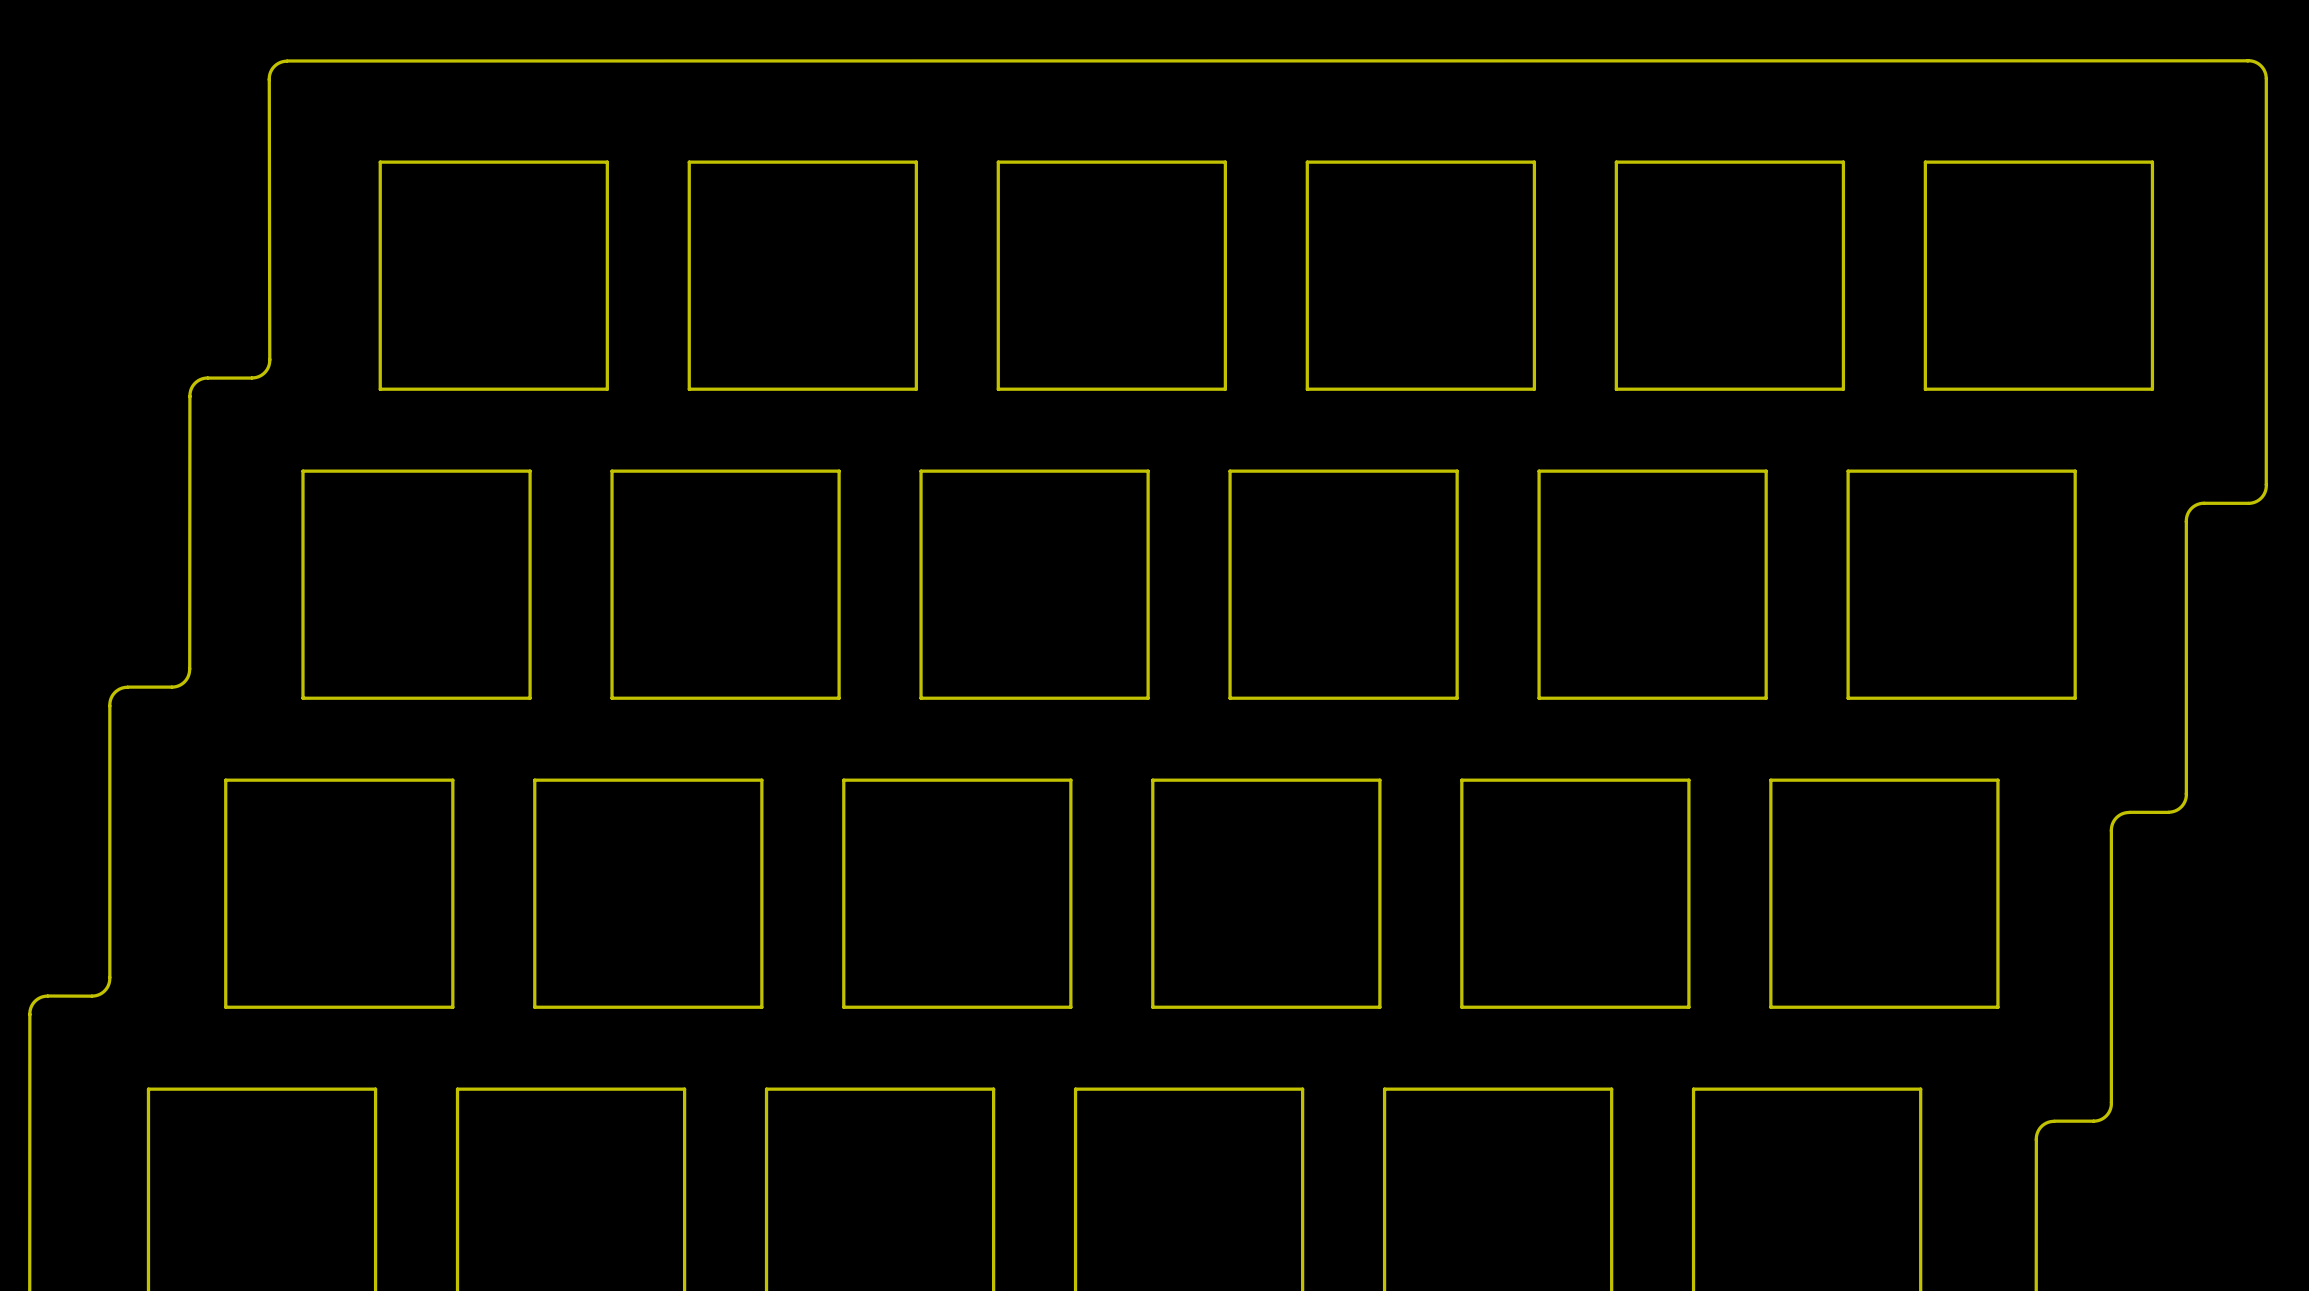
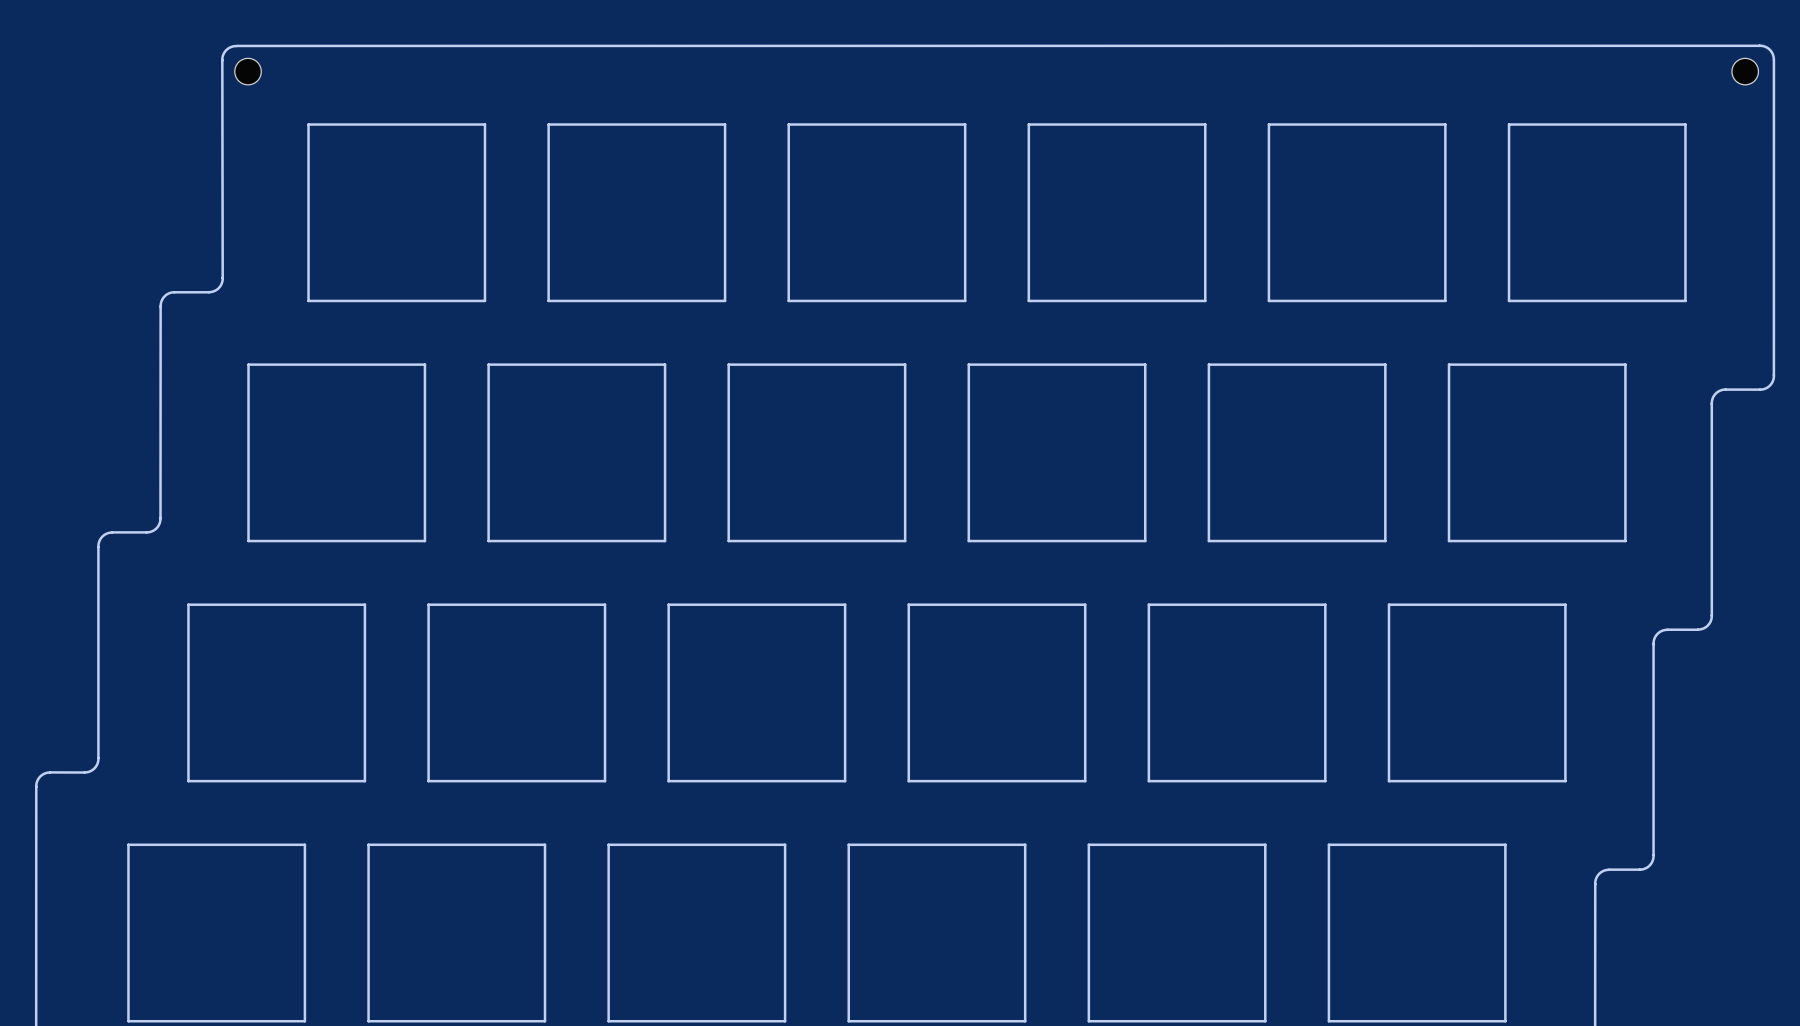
part: none -> (248, 71)
part: none -> (1745, 71)

